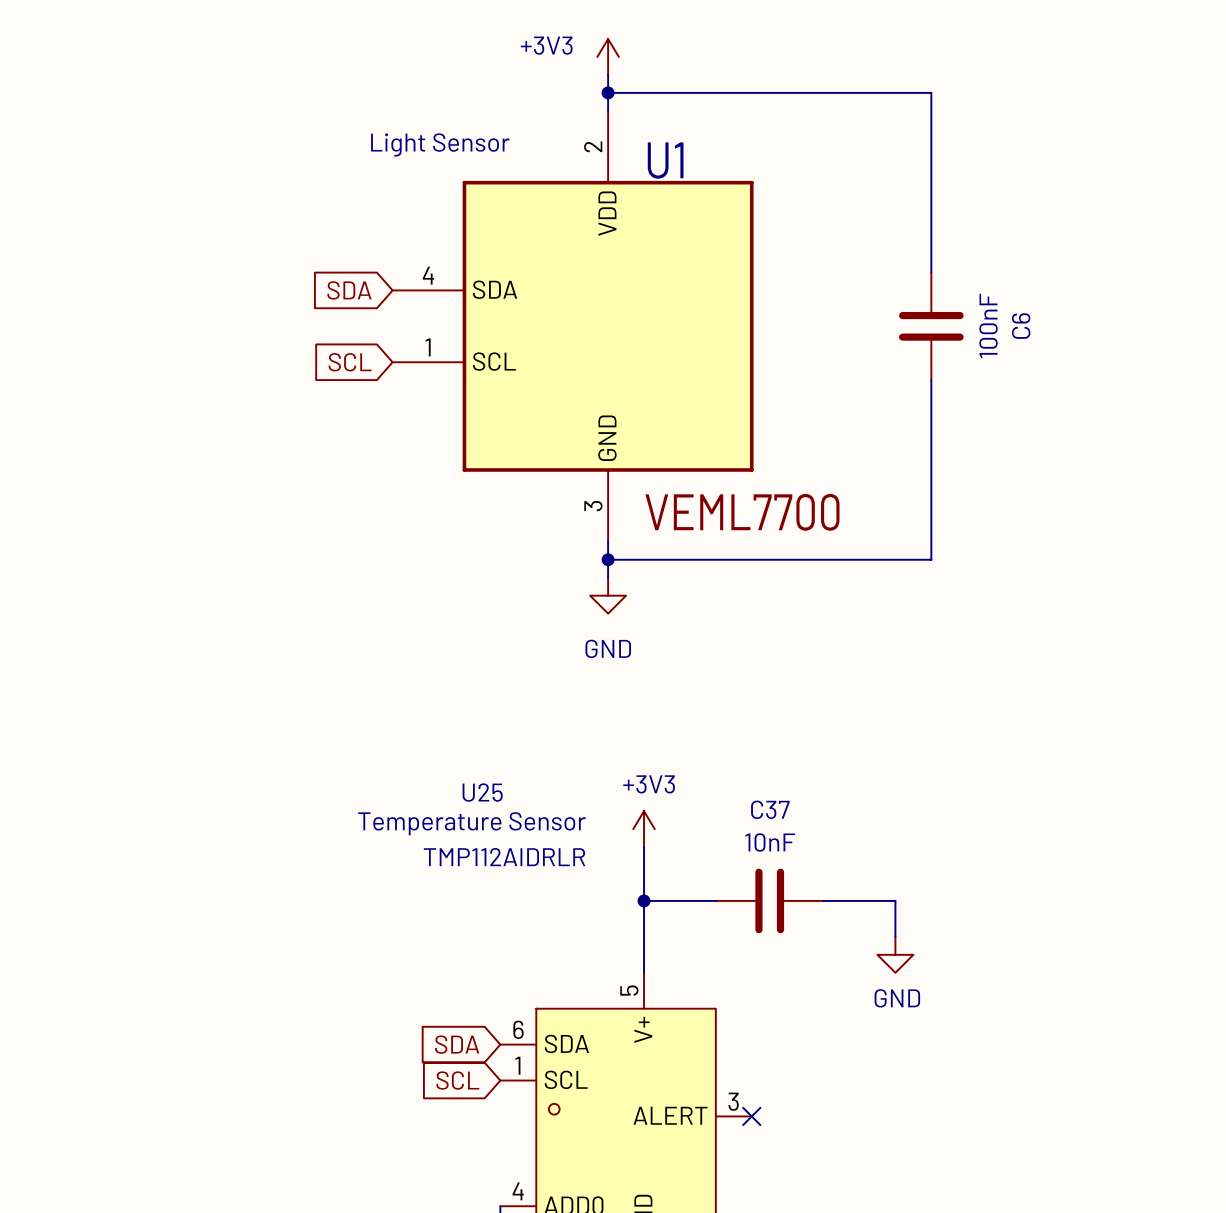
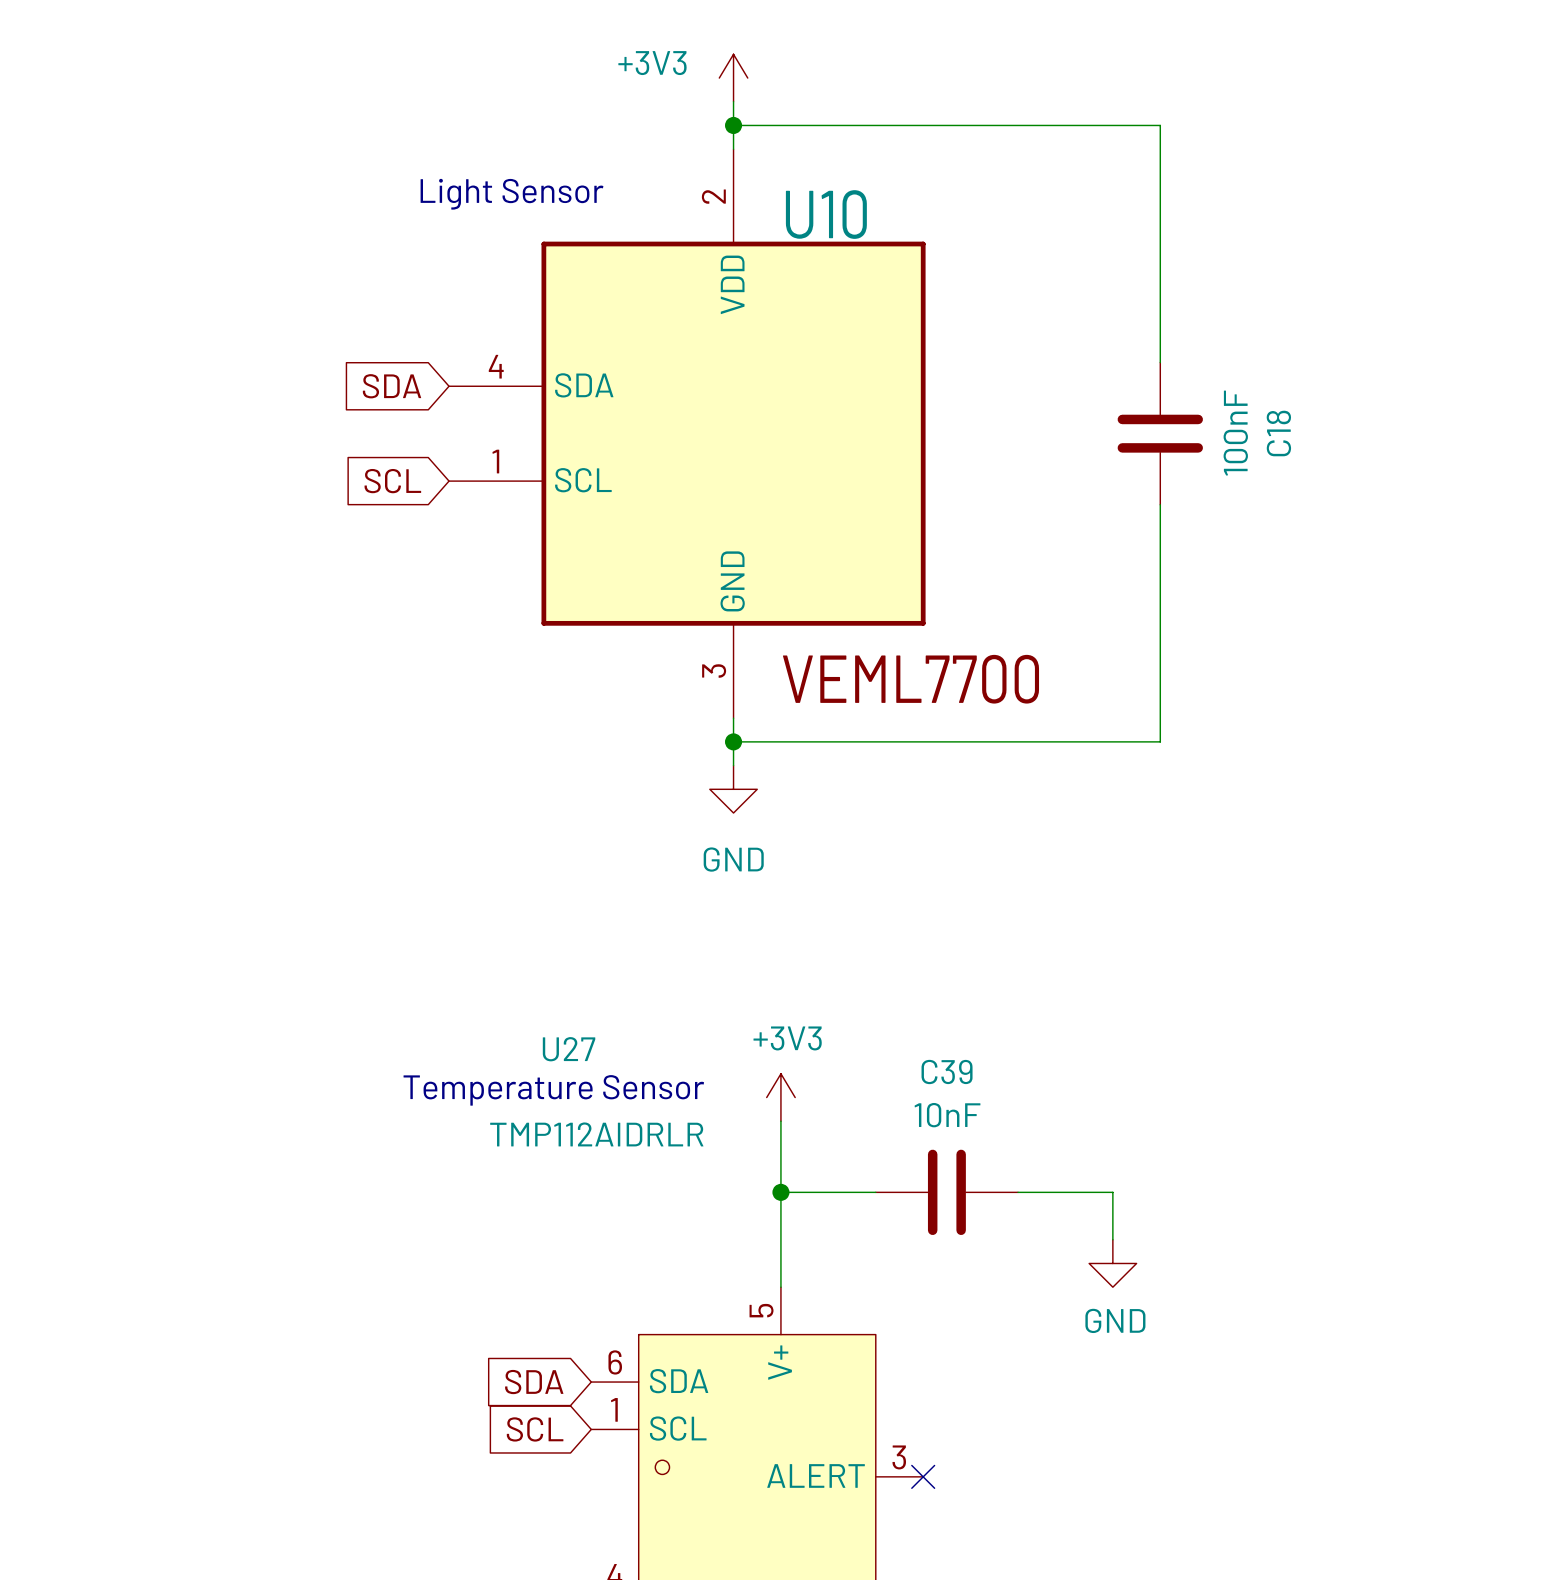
U1 name: U1 (665, 160) -> U10 (826, 214)
C6 name: C6 (1021, 326) -> C18 (1278, 433)
U25 name: U25 (482, 792) -> U27 (569, 1049)
C37 name: C37 (770, 809) -> C39 (947, 1071)

